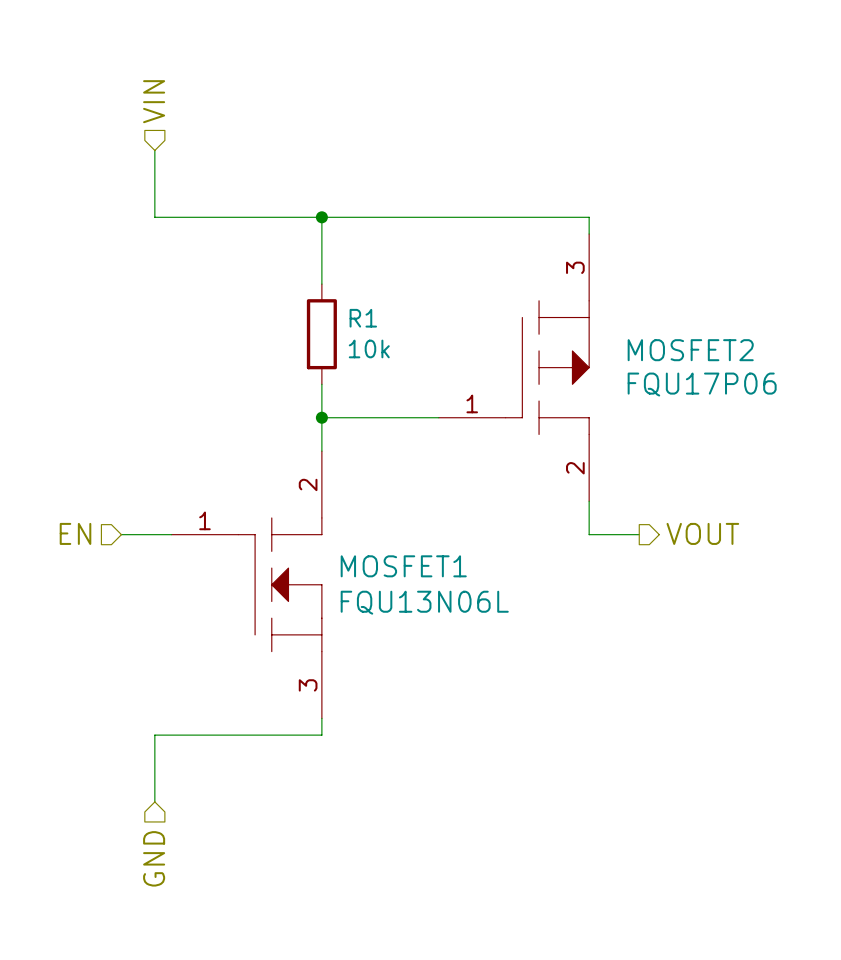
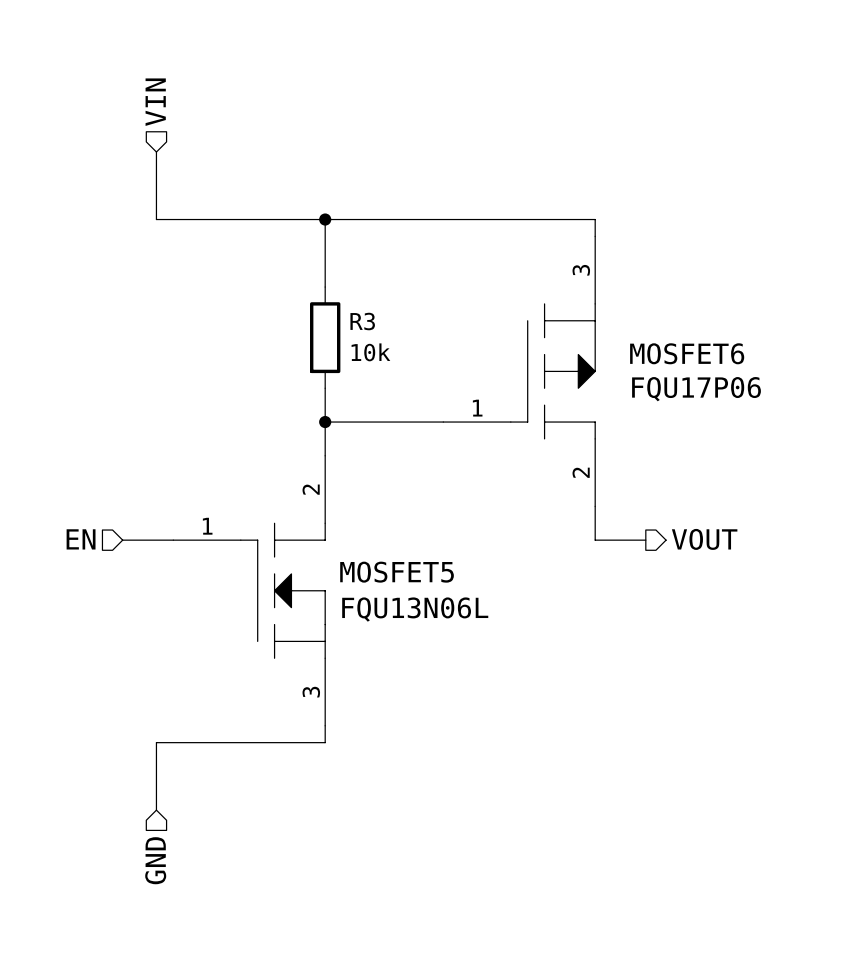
R1 name: R1 (363, 318) -> R3 (362, 321)
MOSFET2 name: MOSFET2 (690, 350) -> MOSFET6 (687, 353)
MOSFET1 name: MOSFET1 (403, 566) -> MOSFET5 (397, 572)

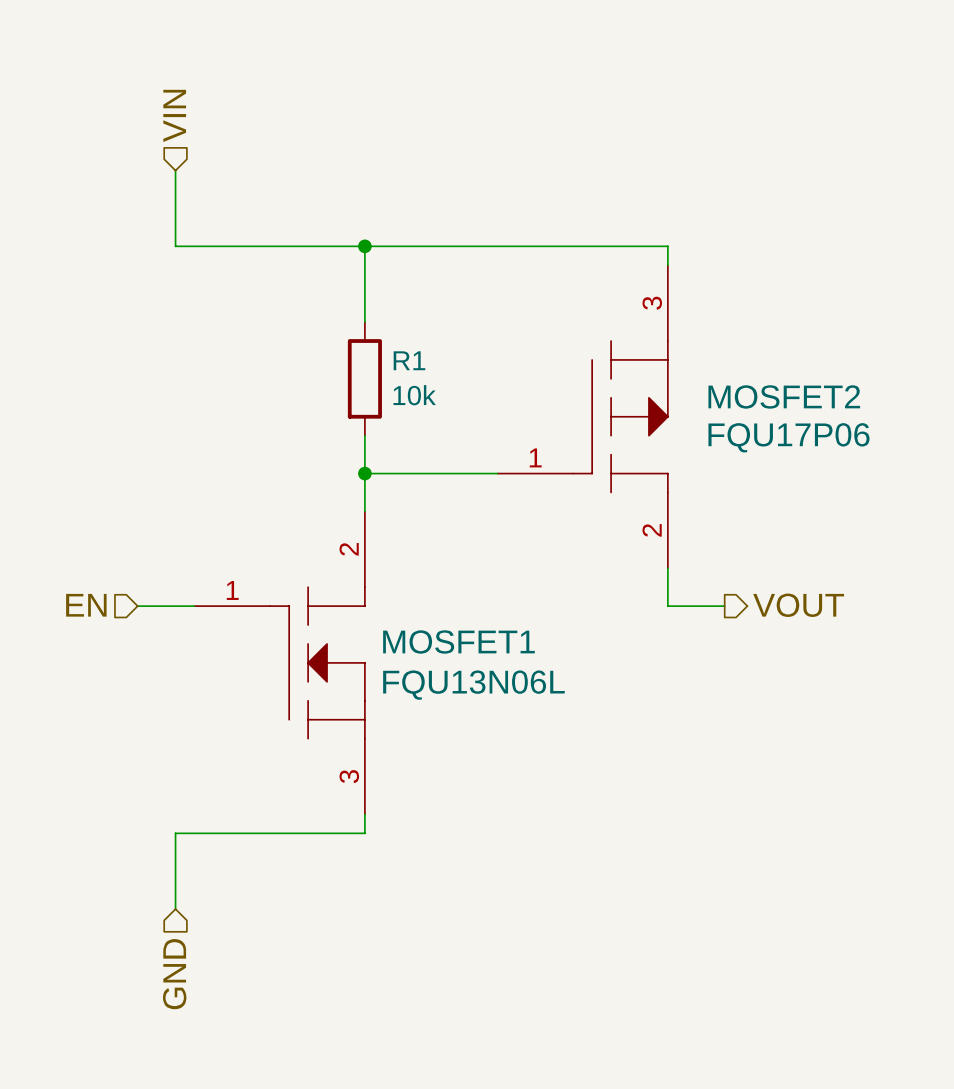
R3 name: R3 (362, 321) -> R1 (409, 360)
MOSFET6 name: MOSFET6 (687, 353) -> MOSFET2 (784, 396)
MOSFET5 name: MOSFET5 (397, 572) -> MOSFET1 (458, 641)

